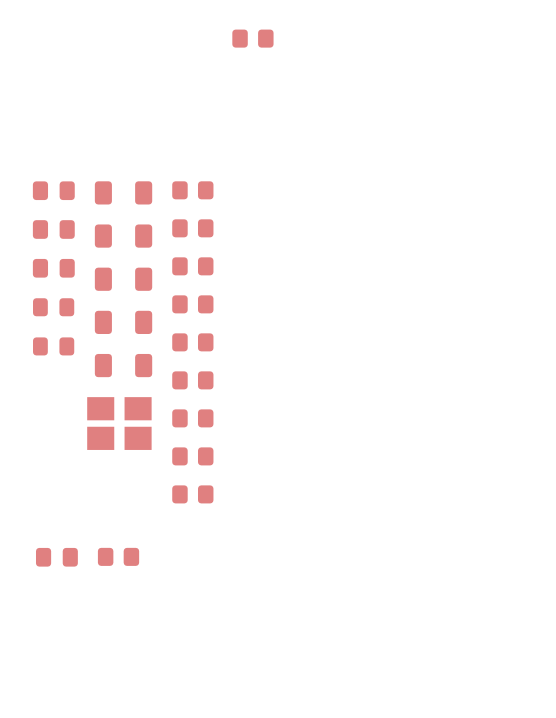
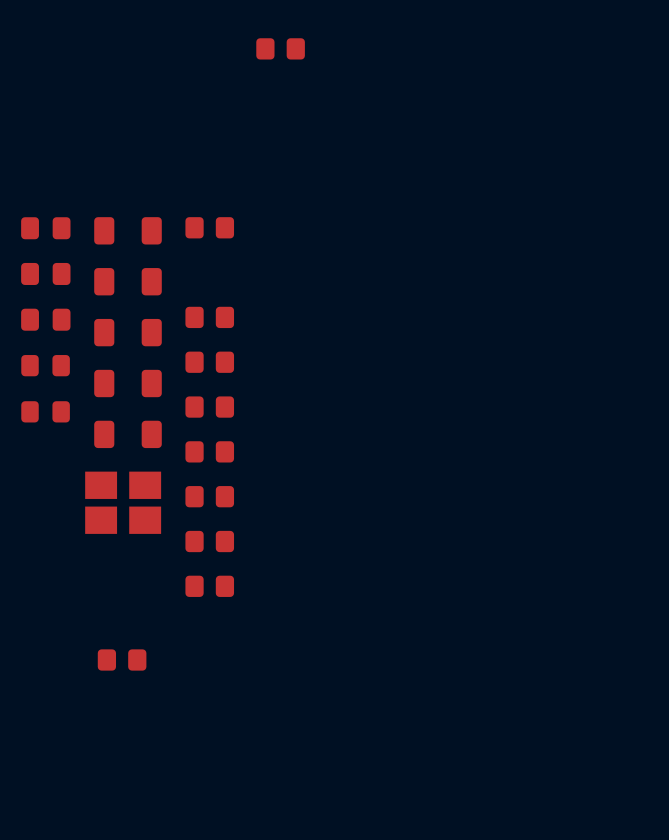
part: (192, 228) -> none
part: (56, 557) -> none

